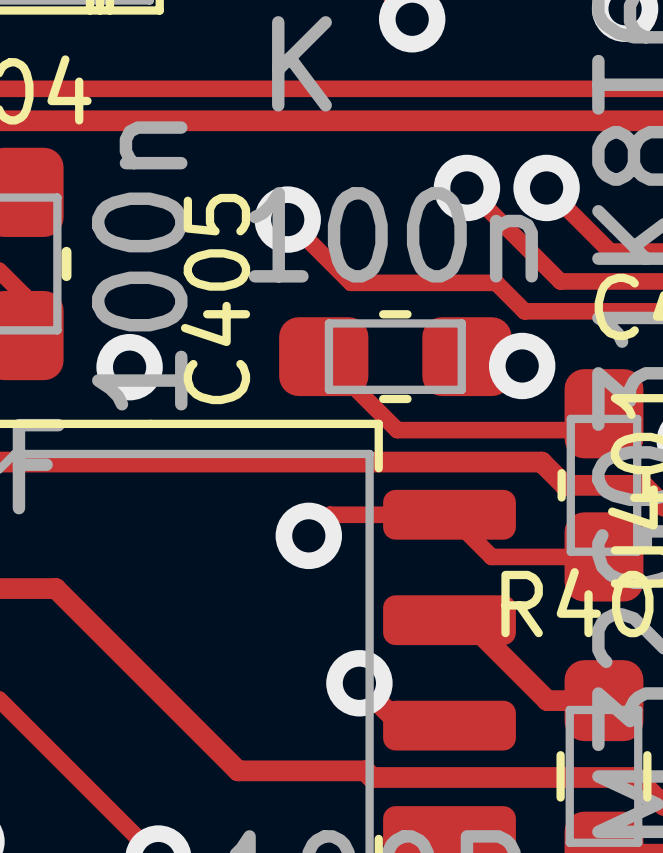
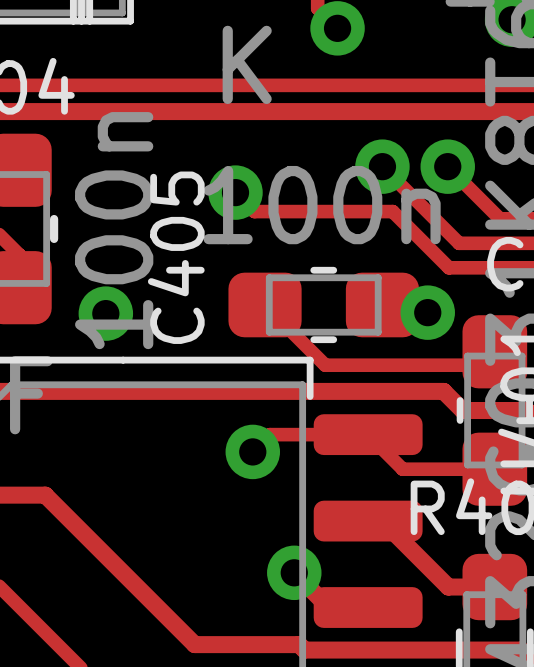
track: (310, 242) (350, 282) (496, 282) (524, 311) (548, 311) -> (254, 211) (392, 211) (448, 267)

